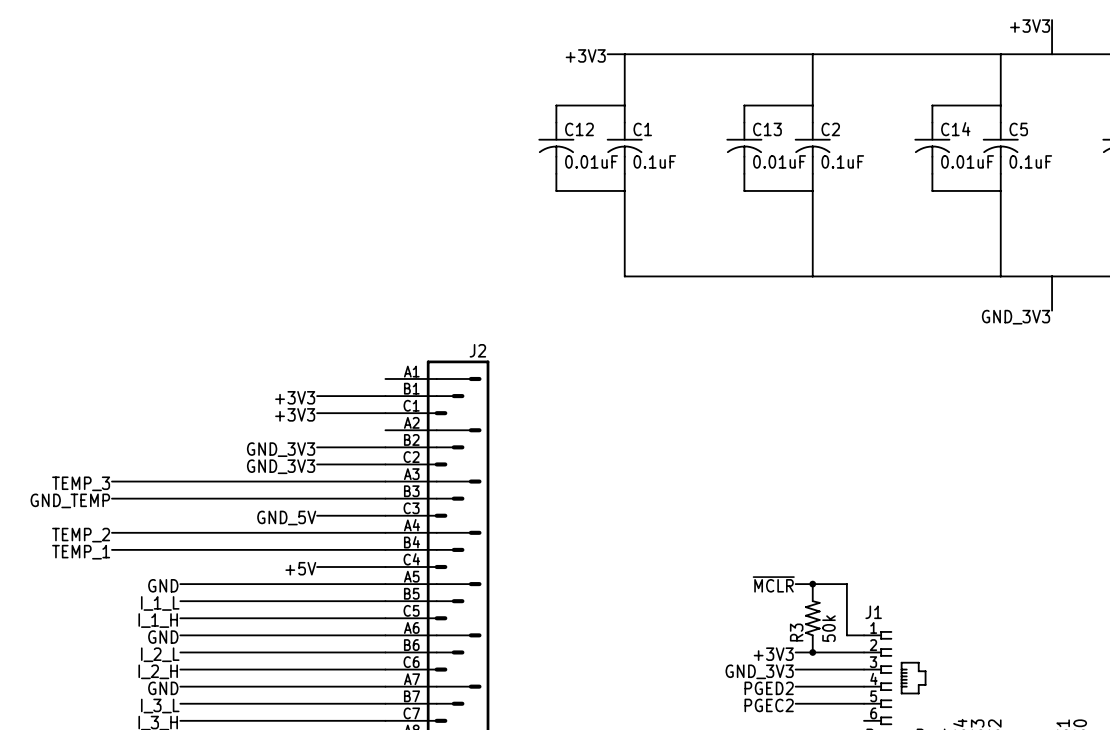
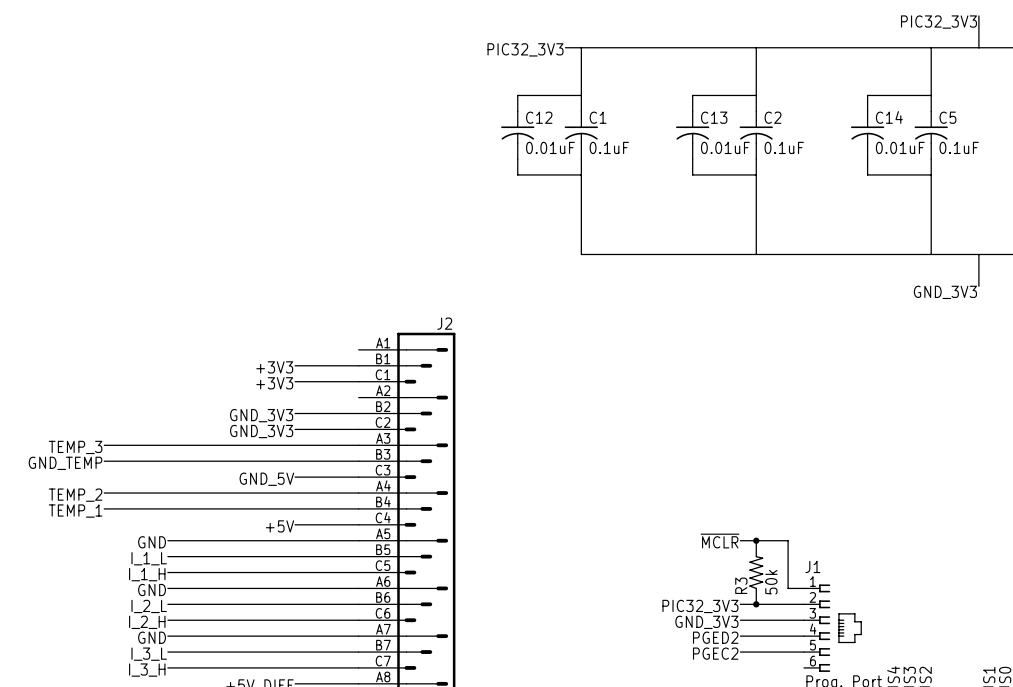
label: +3V3 (1030, 26) -> PIC32_3V3 (938, 22)
label: +3V3 (585, 55) -> PIC32_3V3 (525, 49)
label: +3V3 (773, 654) -> PIC32_3V3 (700, 606)

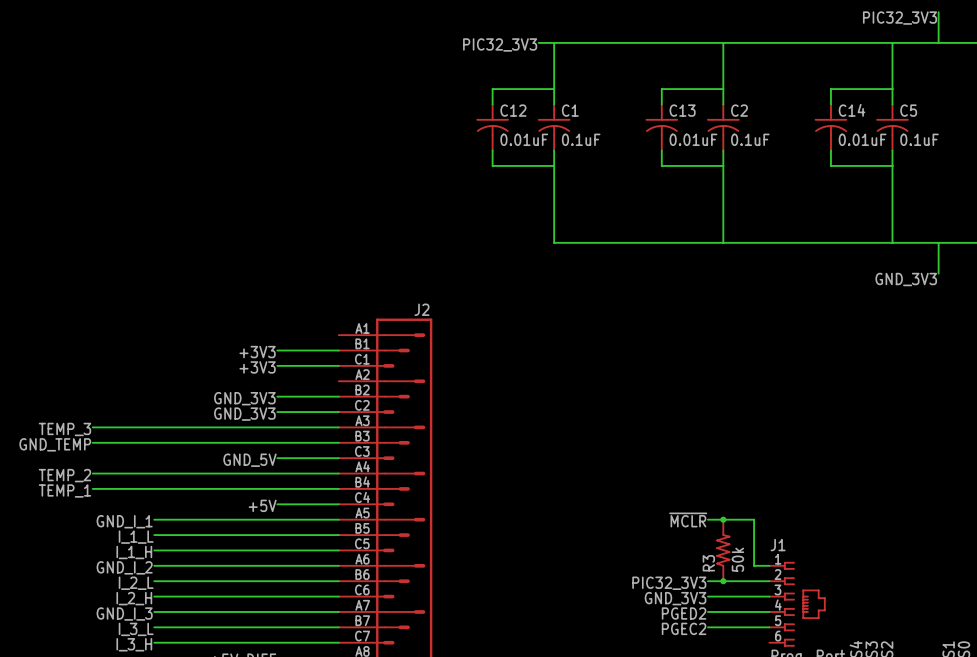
label: GND (152, 542) -> GND_I_1 (124, 521)
label: GND (152, 590) -> GND_I_2 (124, 567)
label: GND (152, 637) -> GND_I_3 (124, 614)

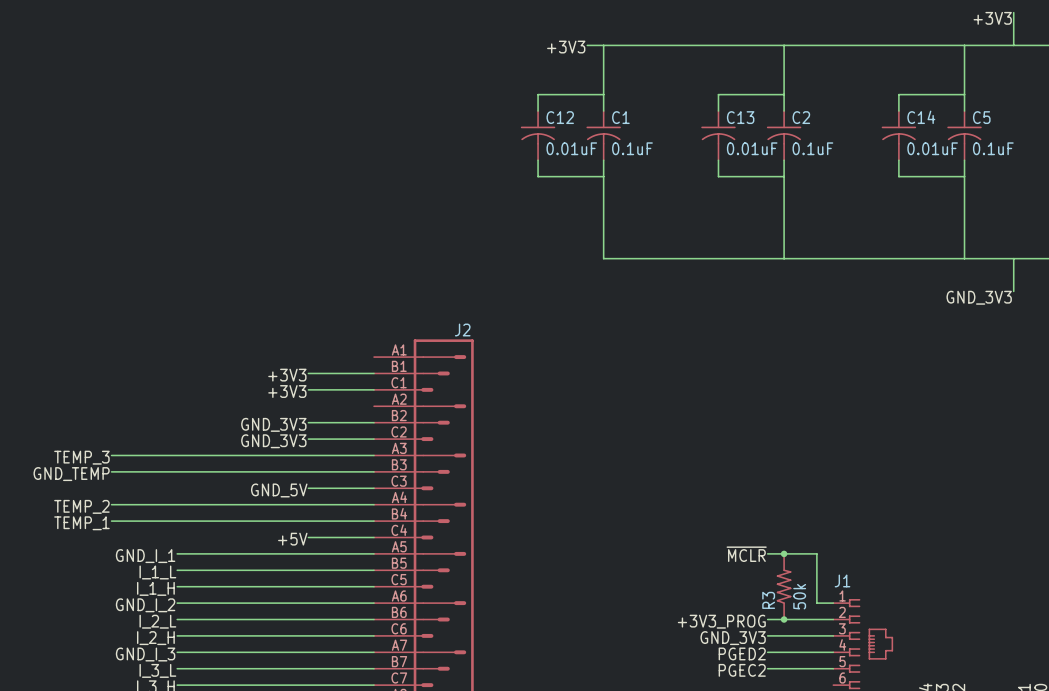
label: PIC32_3V3 (899, 18) -> +3V3 (992, 18)
label: PIC32_3V3 (500, 44) -> +3V3 (566, 47)
label: PIC32_3V3 (669, 583) -> +3V3_PROG (721, 621)

